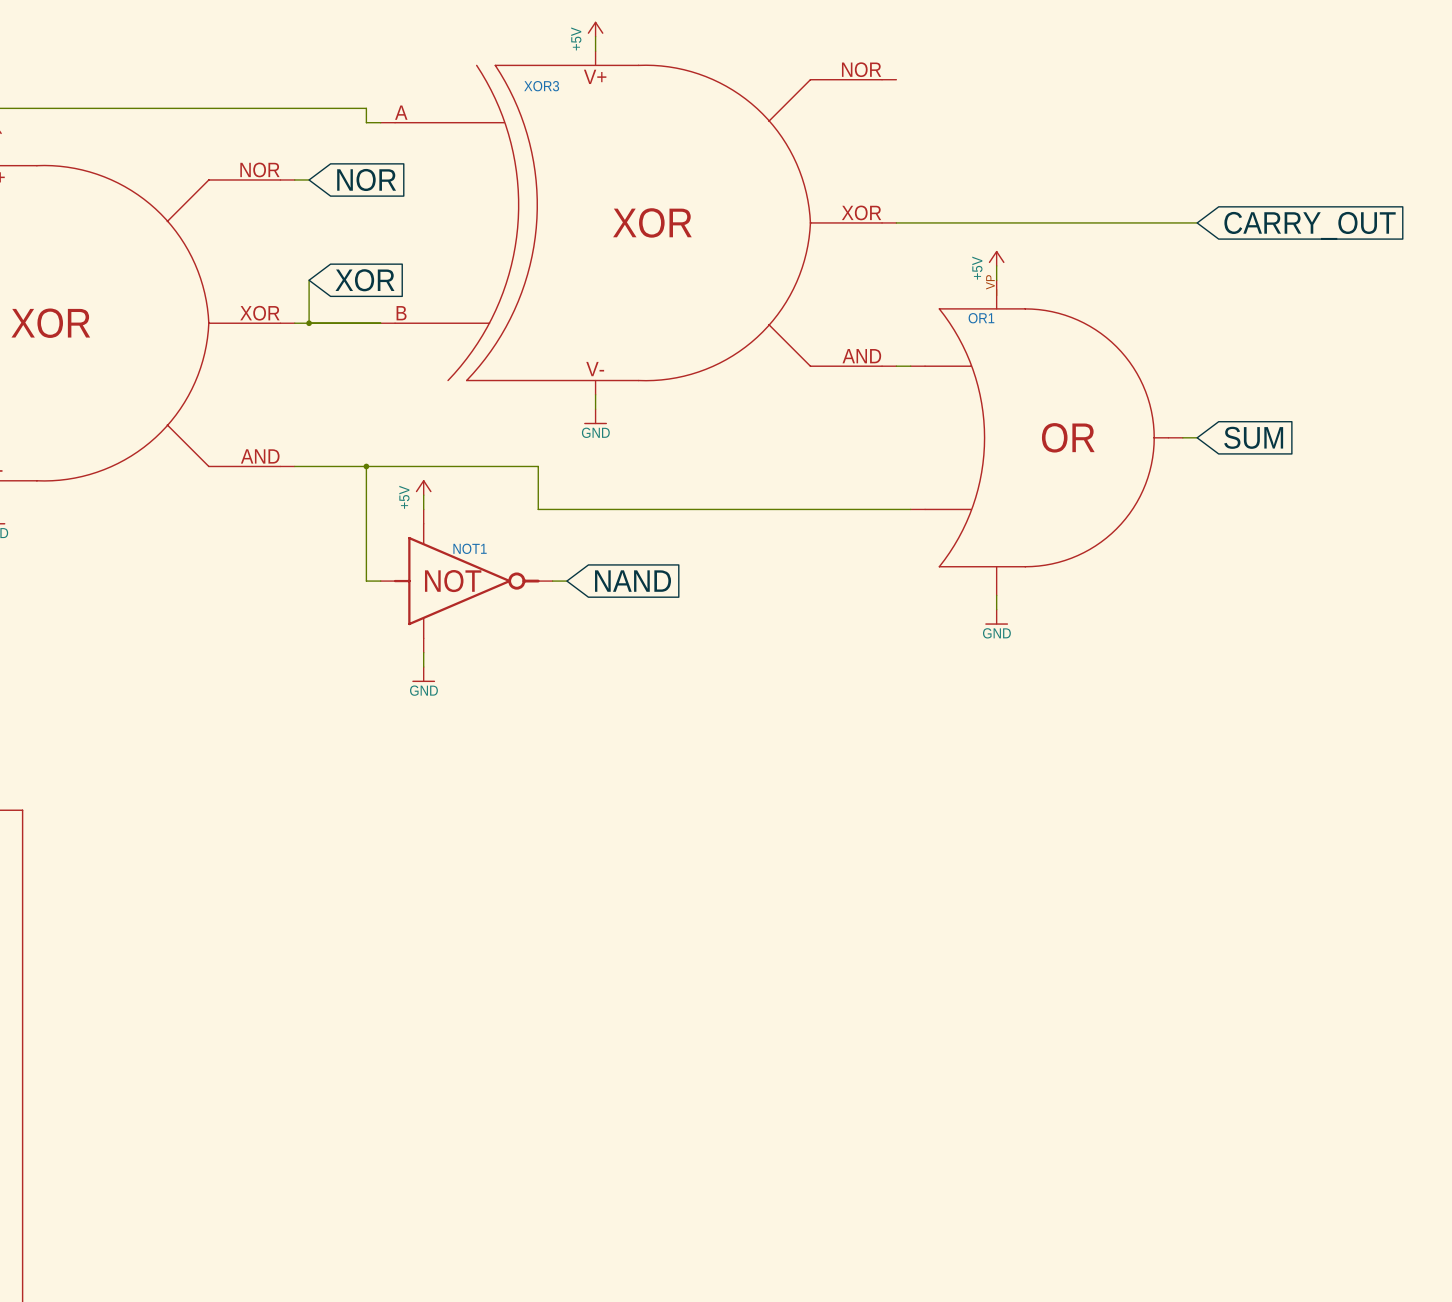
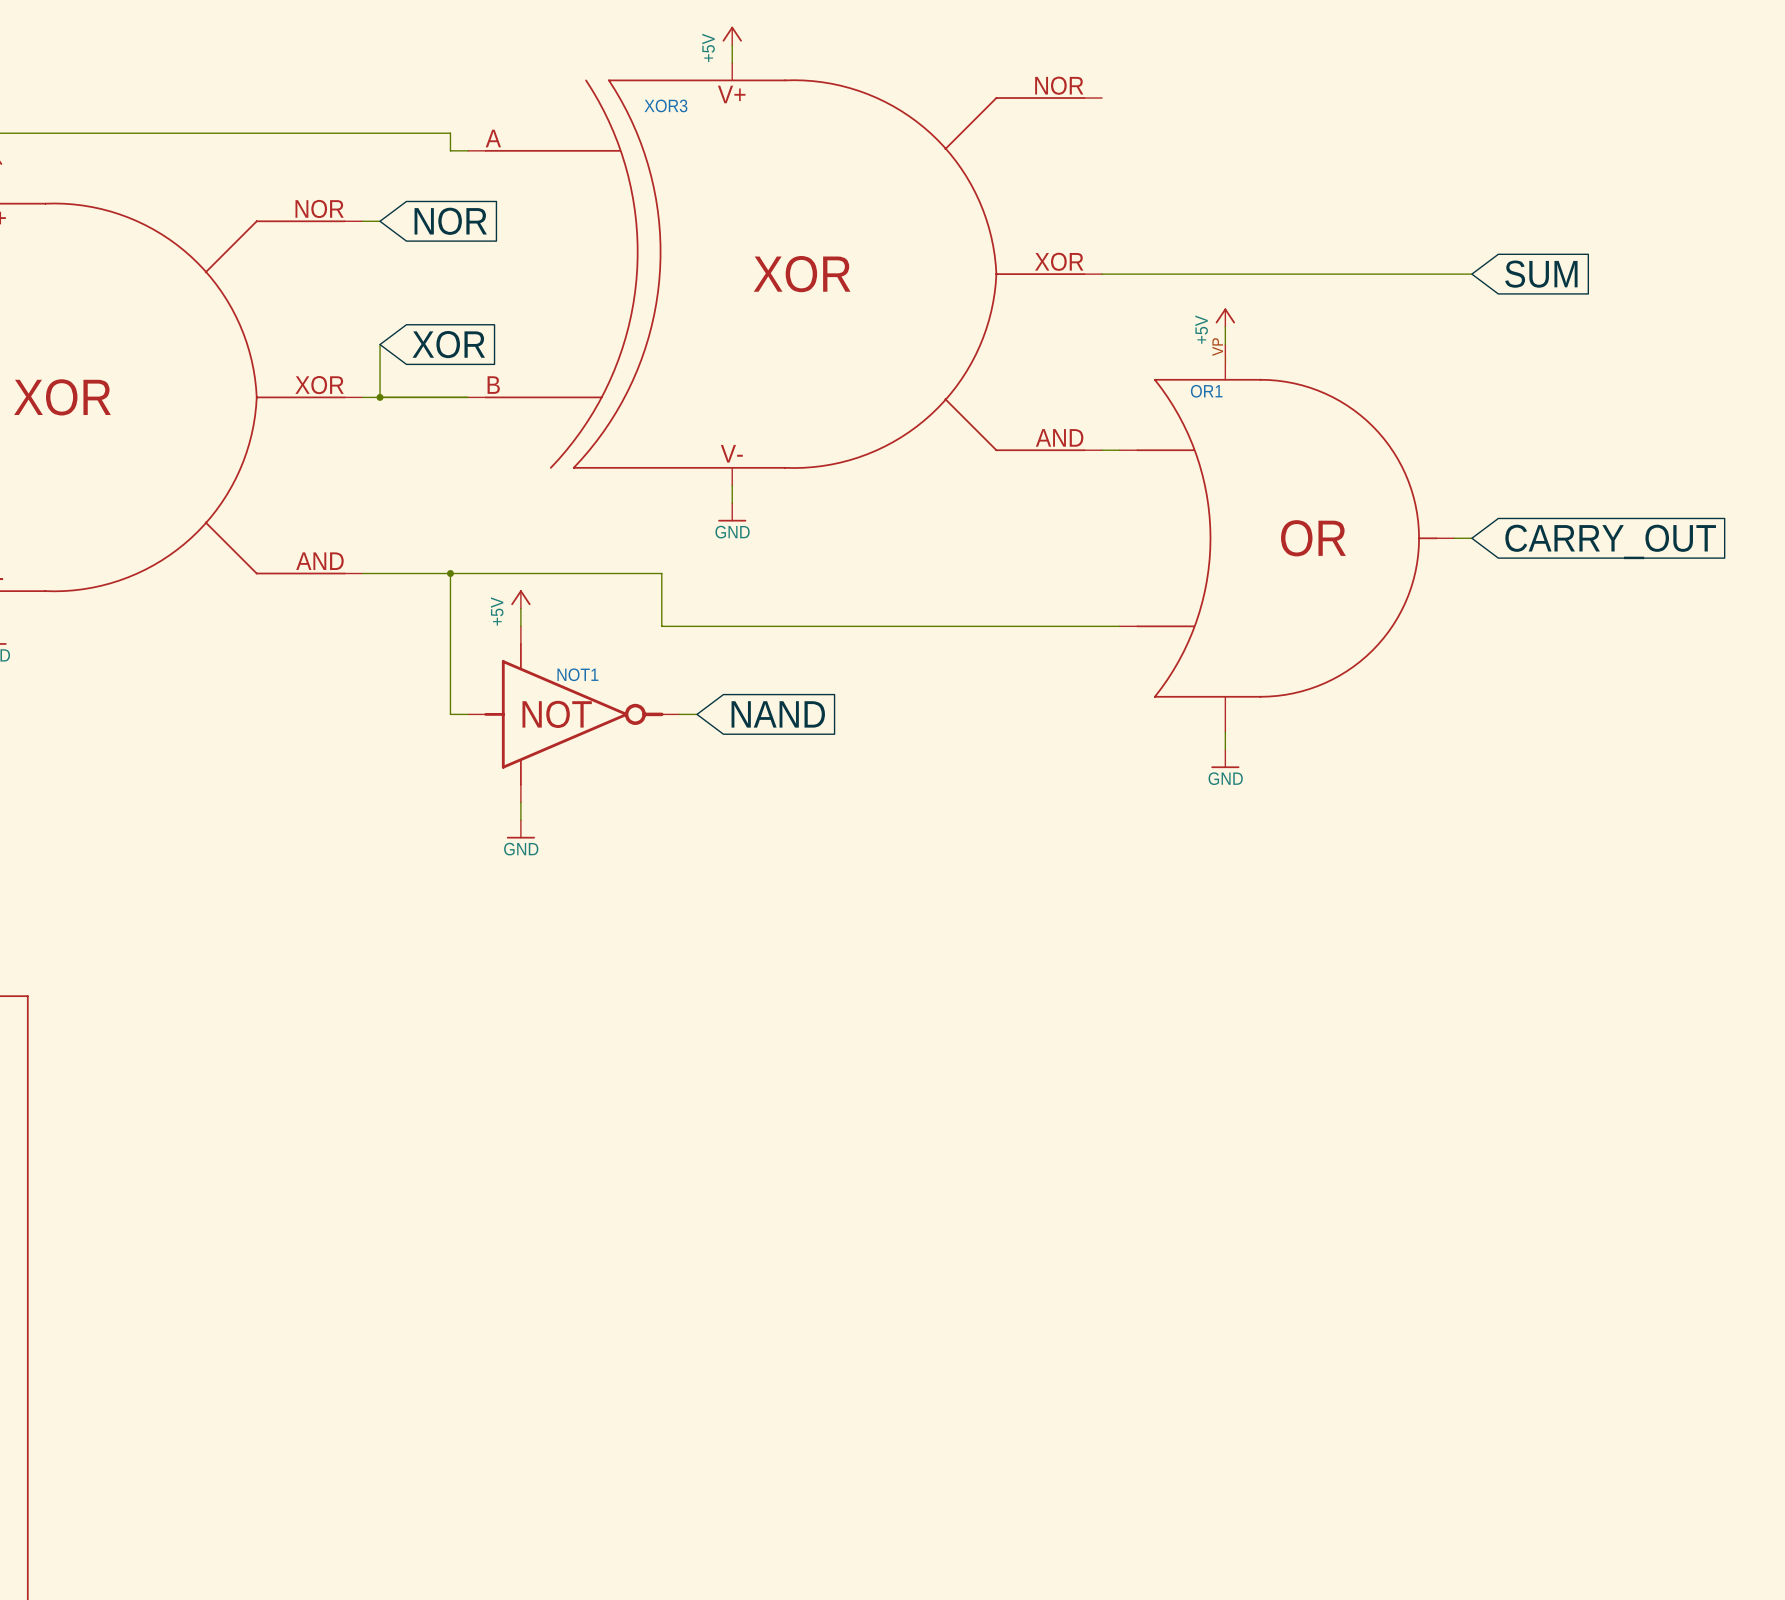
global label: CARRY_OUT (1310, 225) -> SUM (1541, 274)
global label: SUM (1253, 437) -> CARRY_OUT (1610, 541)

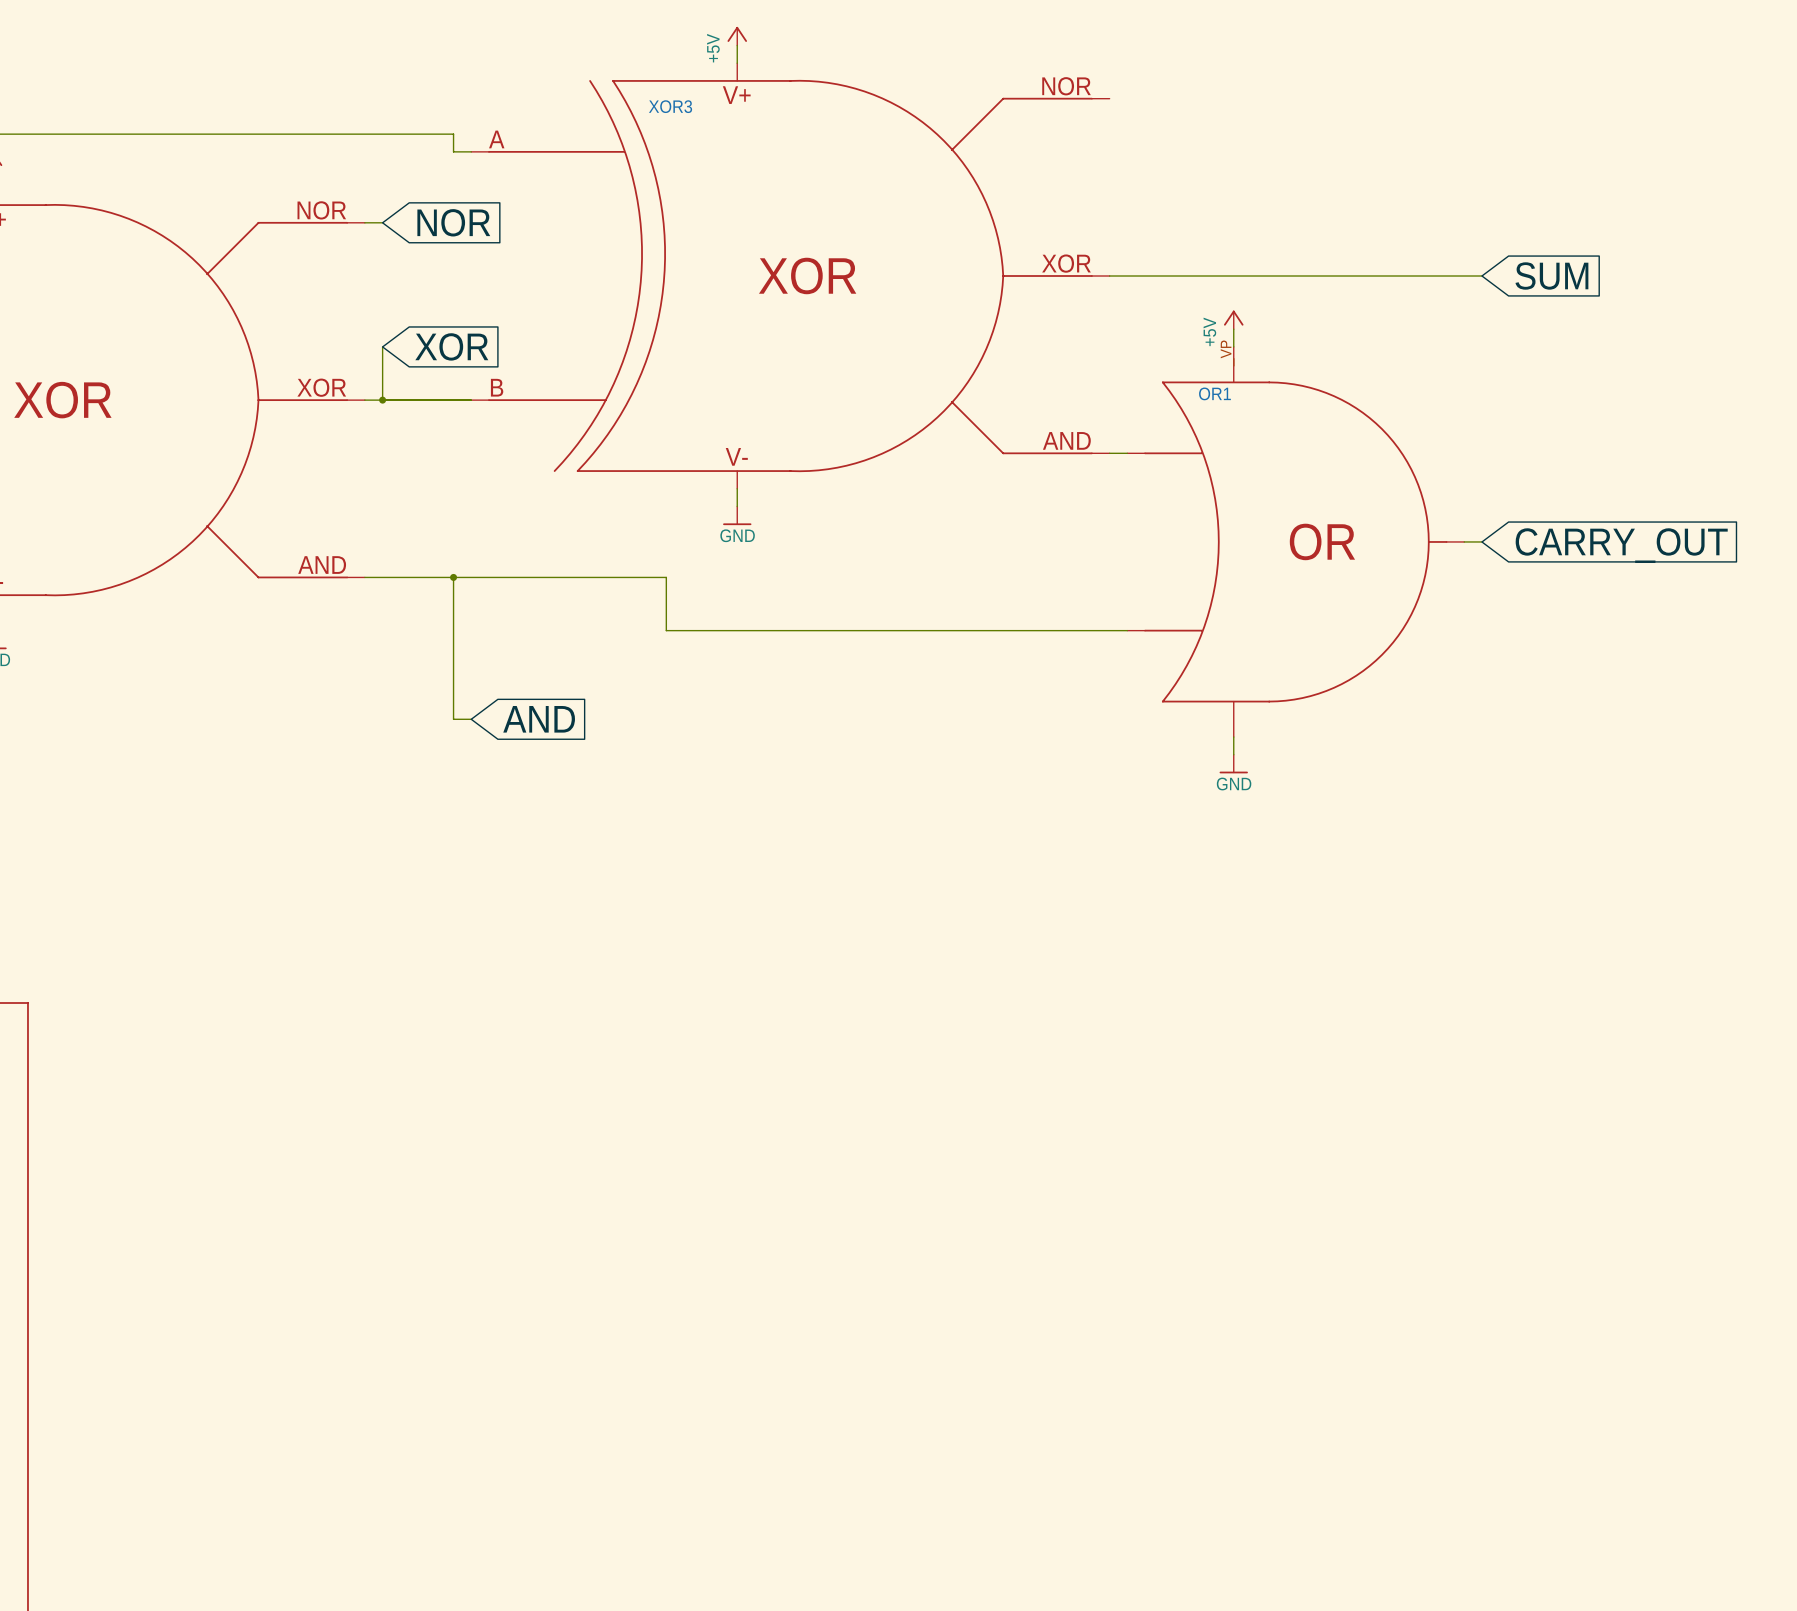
power symbol: +5V (520, 599) -> none
wire: (520, 608) (520, 626) -> none
global label: none -> AND (539, 719)
NOT1: (573, 714) -> none
wire: (679, 714) (697, 714) -> none
global label: NAND (778, 714) -> none
wire: (520, 802) (520, 820) -> none
power symbol: GND (520, 829) -> none

